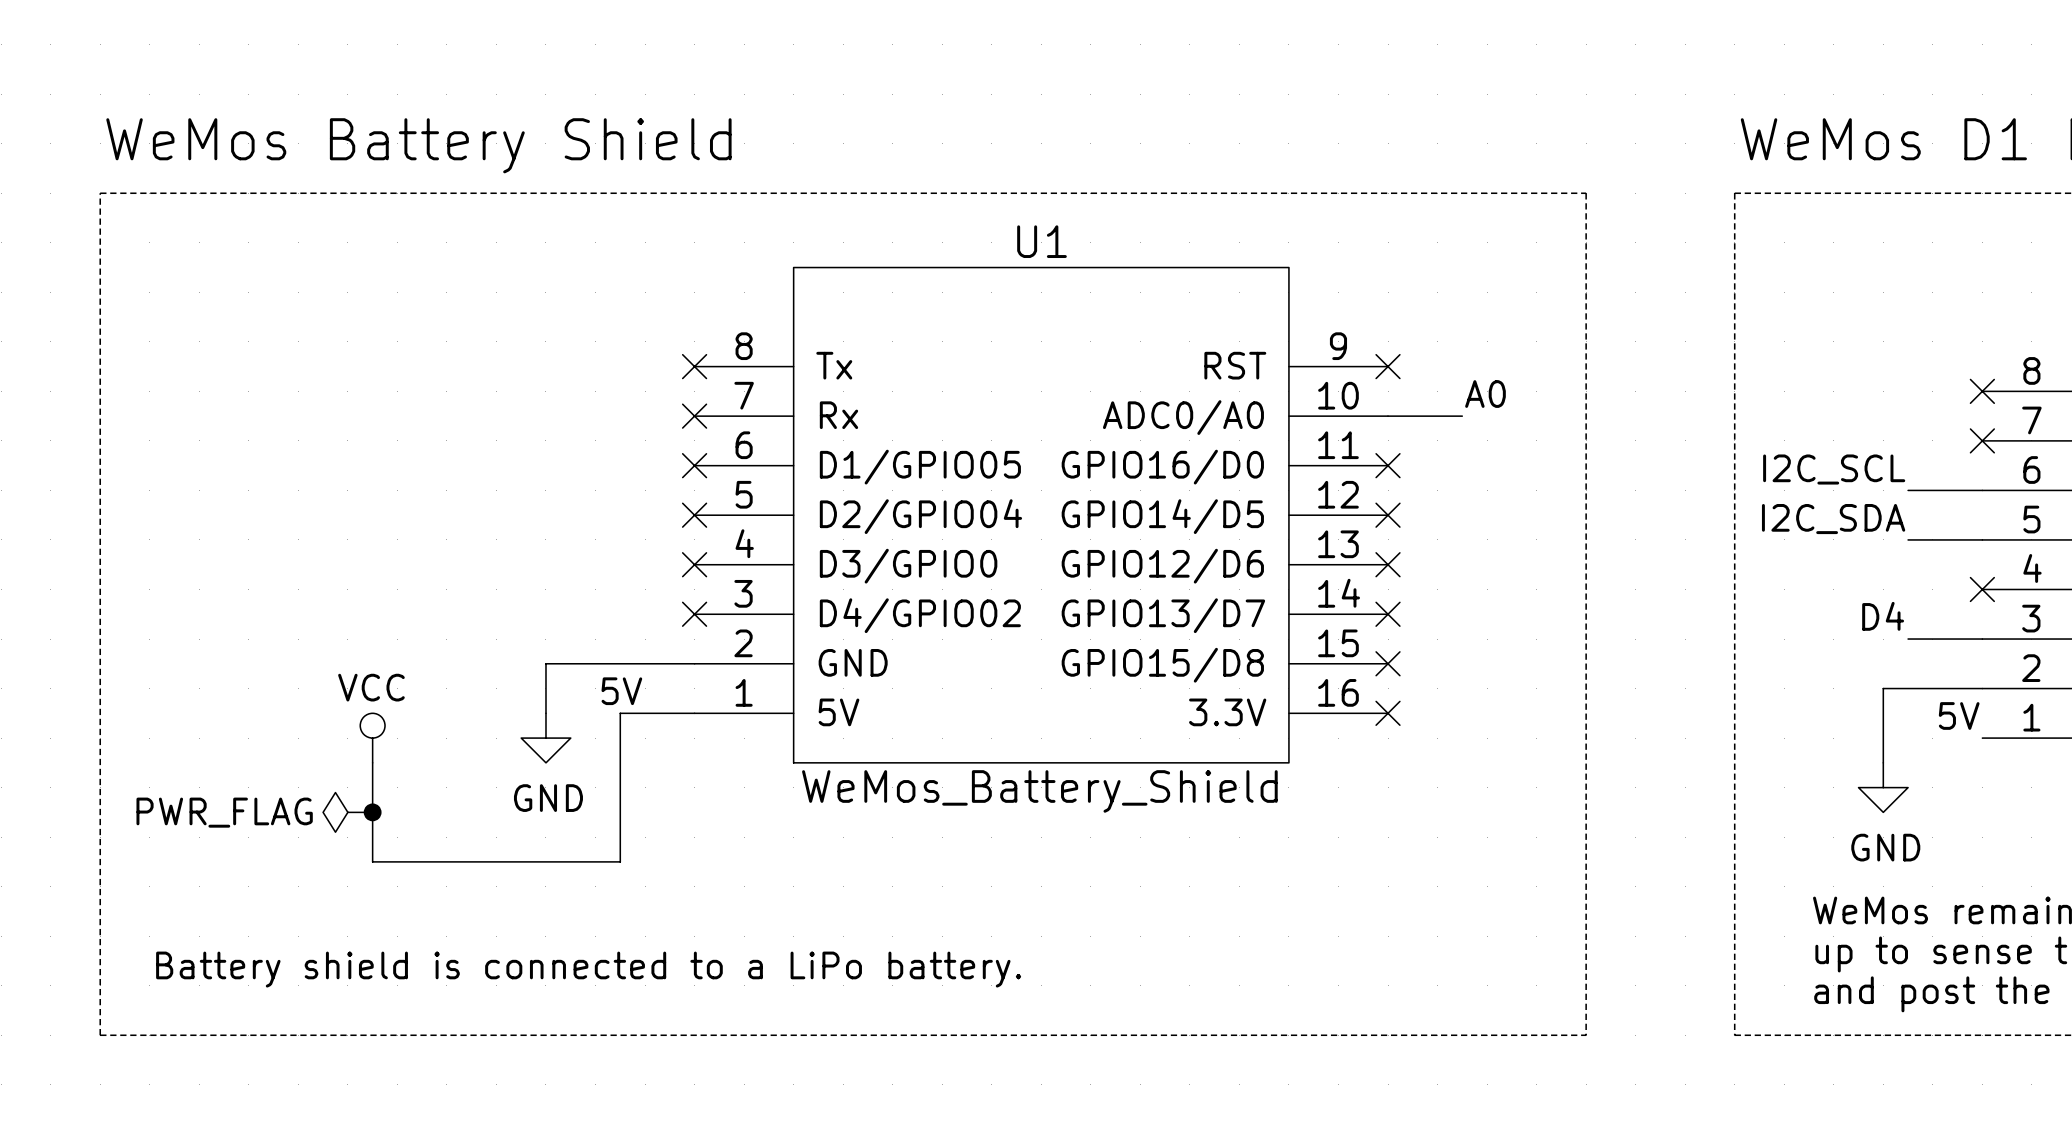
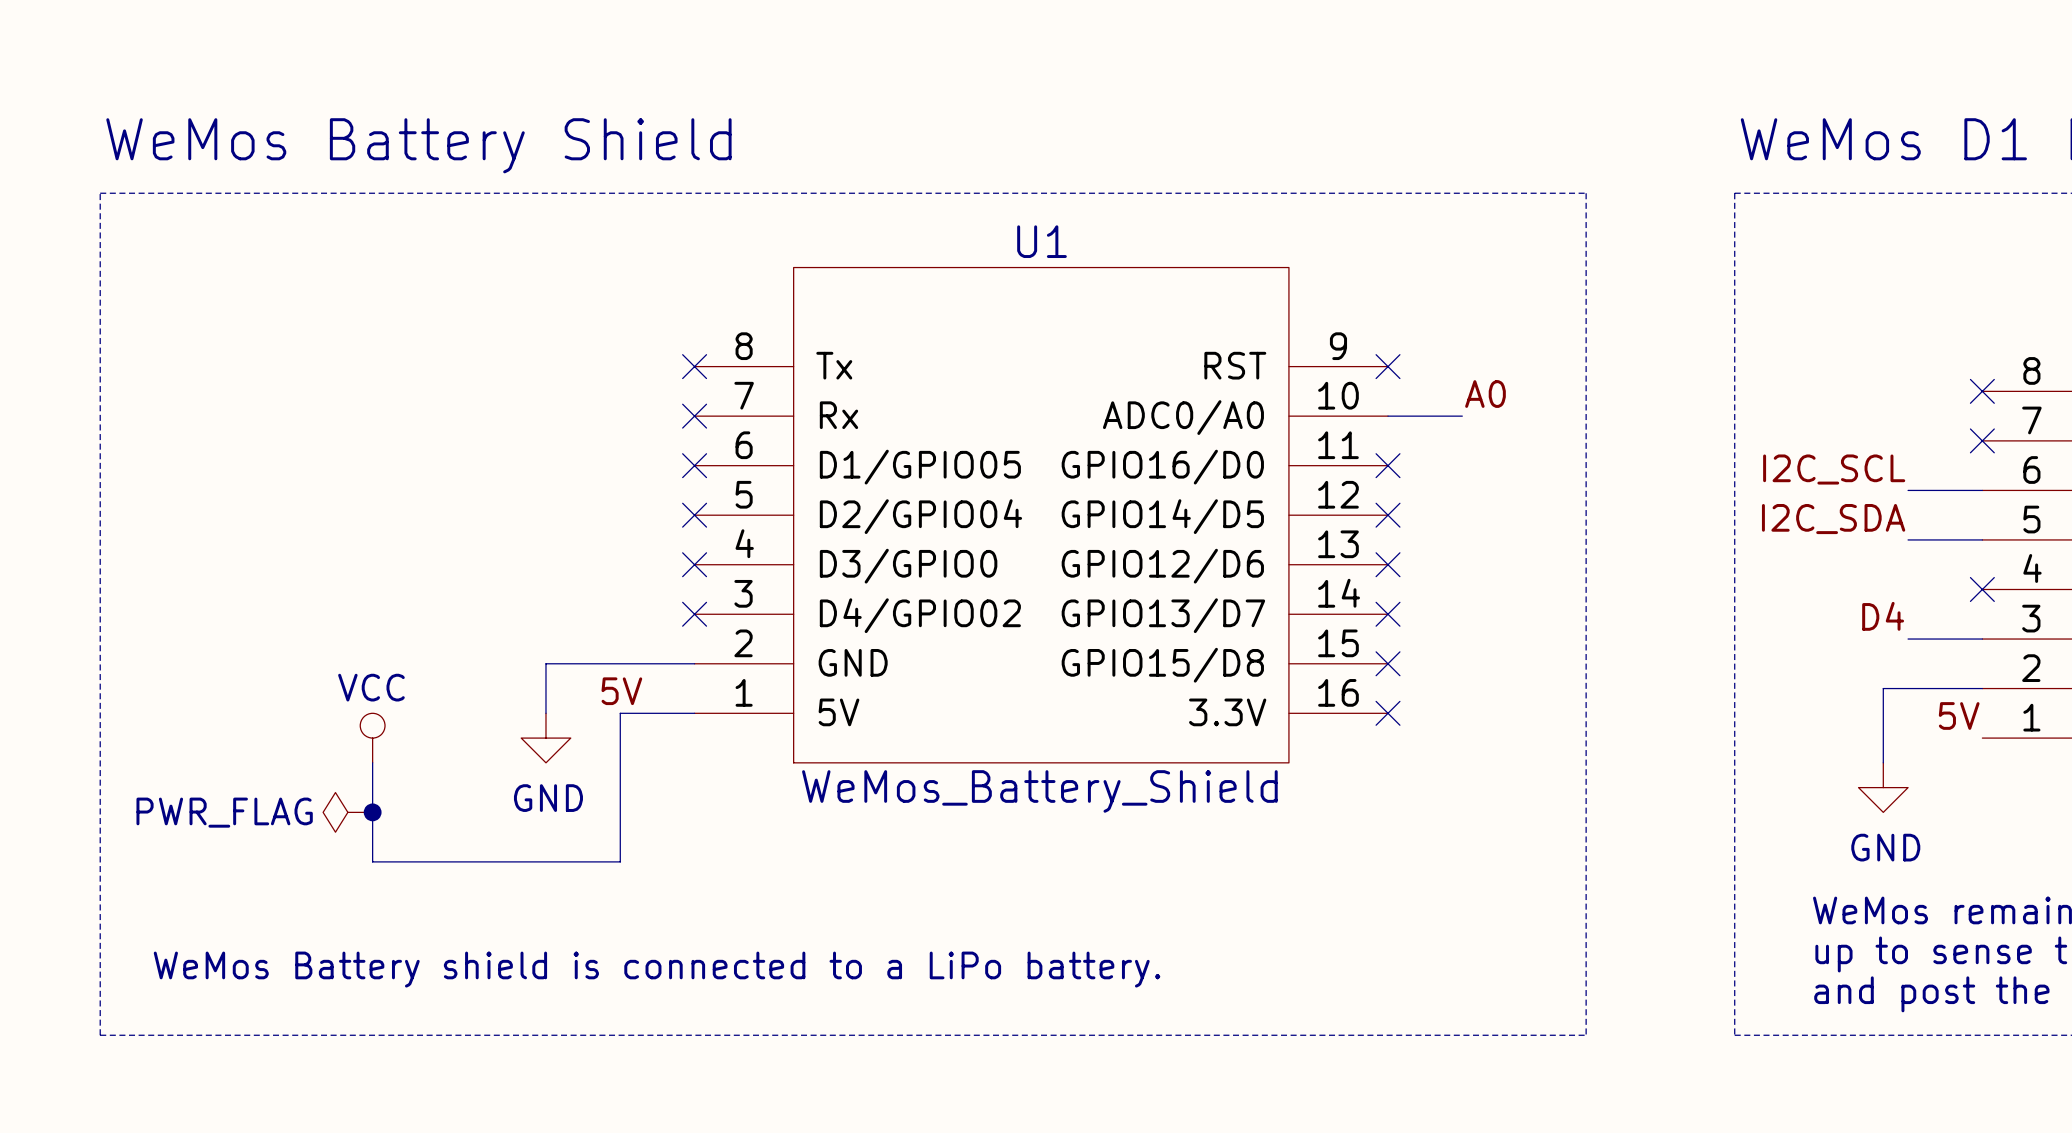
text: Battery shield is connected to a LiPo battery. (588, 969) -> WeMos Battery shield is connected to a LiPo battery. (657, 969)

